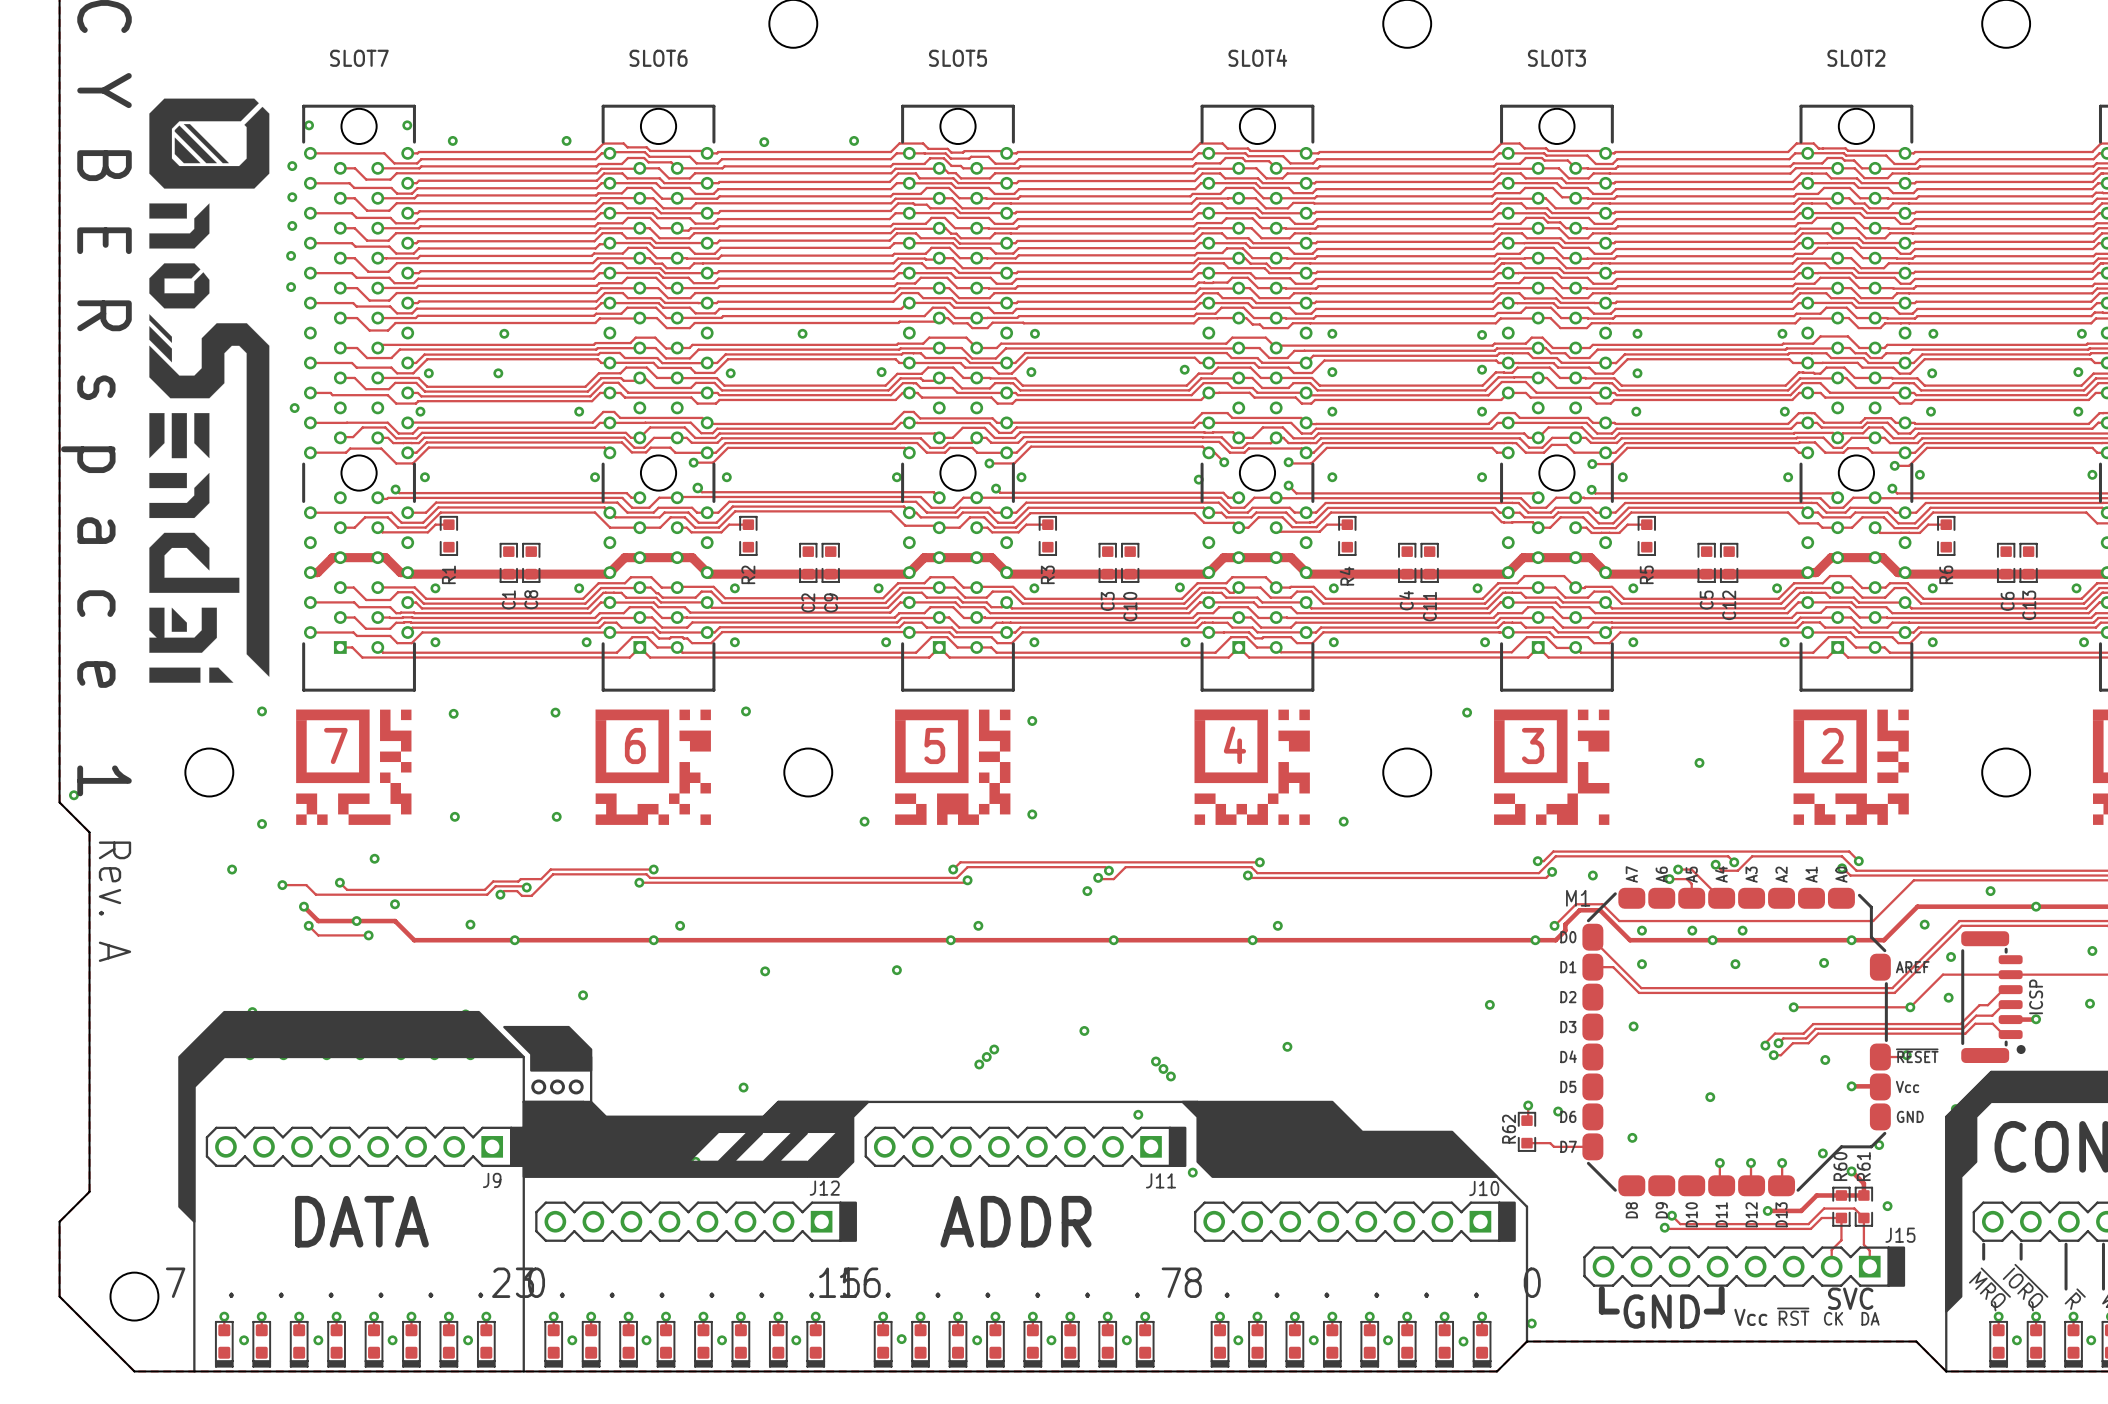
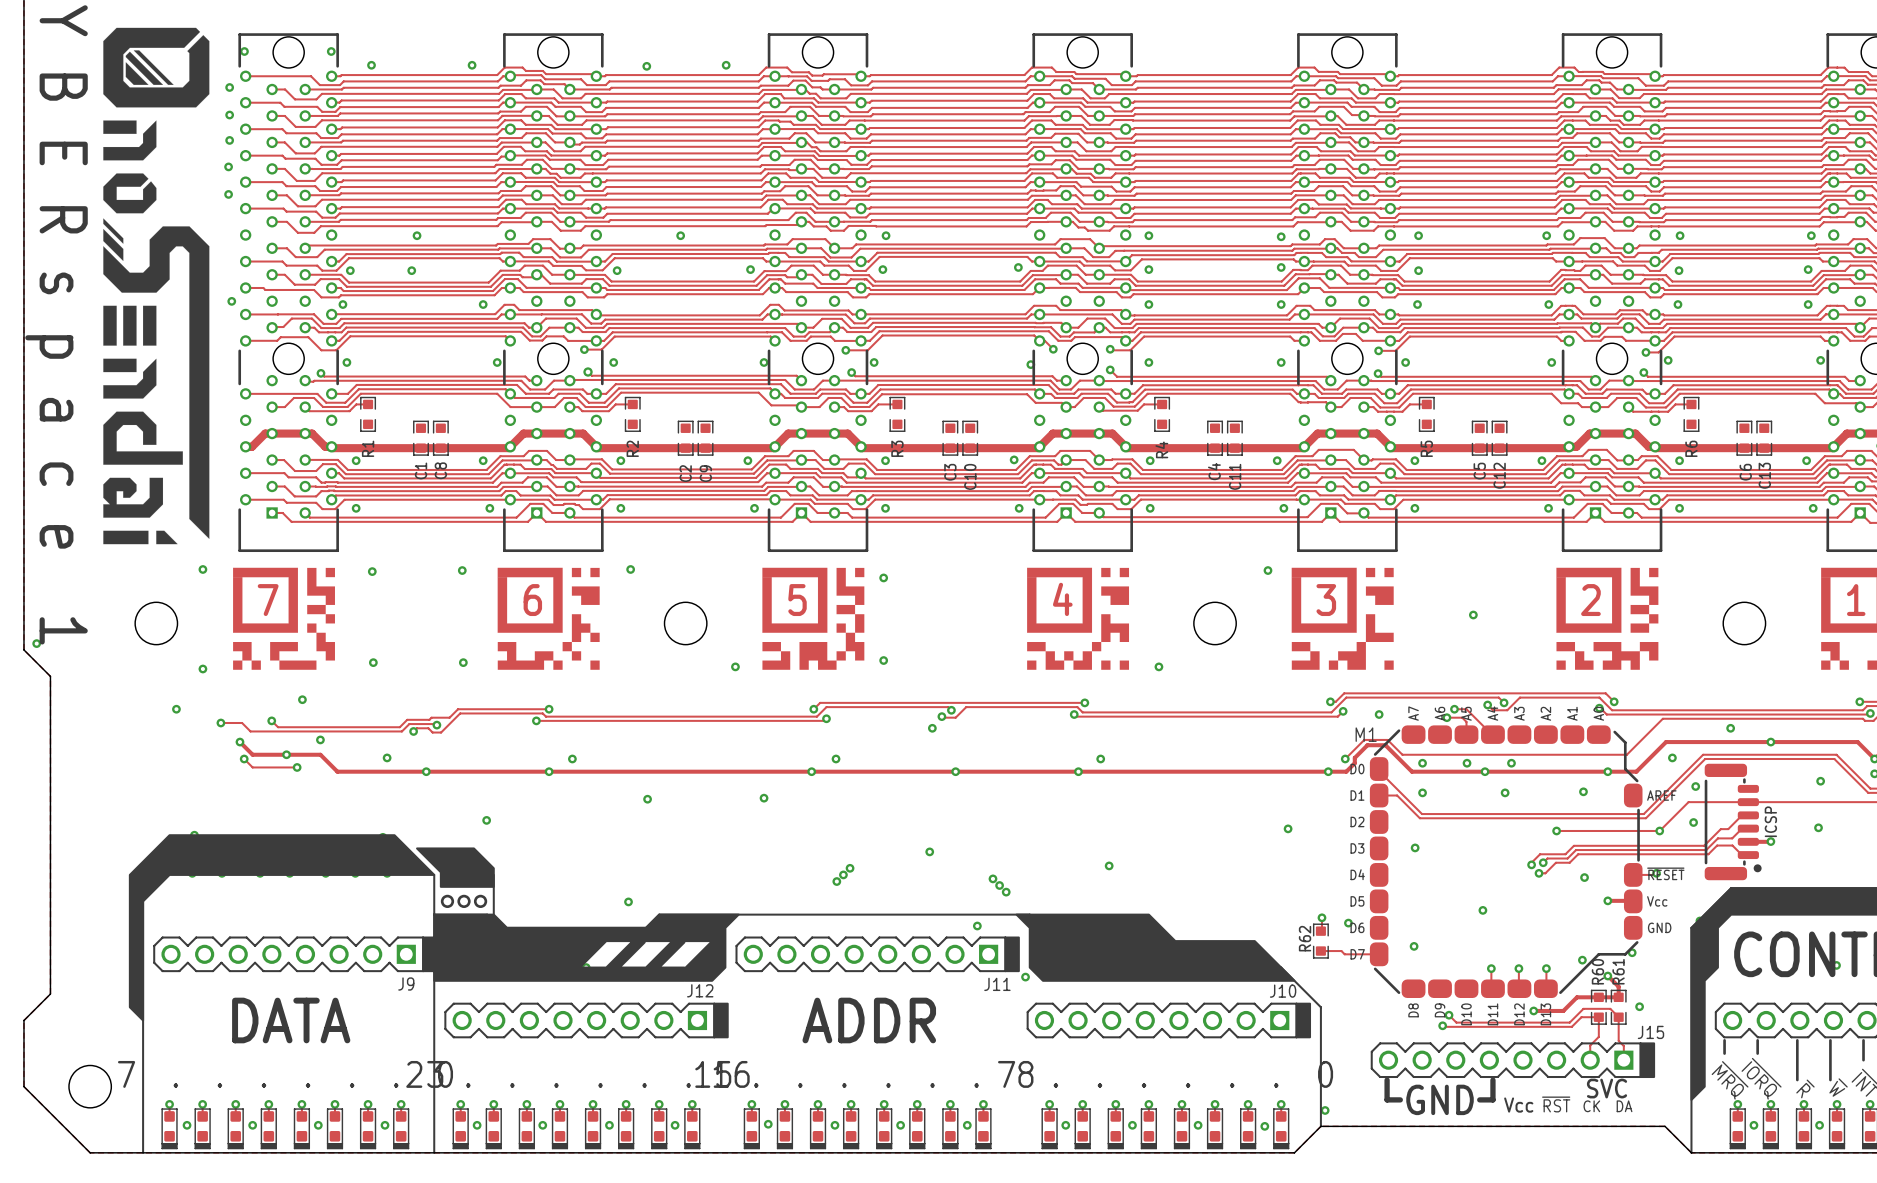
drawing shape: [149, 413, 165, 459] -> [103, 305, 117, 346]
drawing shape: [194, 413, 210, 459] -> [143, 305, 157, 346]
drawing shape: [149, 532, 240, 593] -> [103, 411, 183, 465]
drawing shape: [149, 607, 217, 653] -> [103, 477, 164, 518]
drawing: [171, 607, 187, 632] -> none
text: Rev. A (114, 901) -> none

